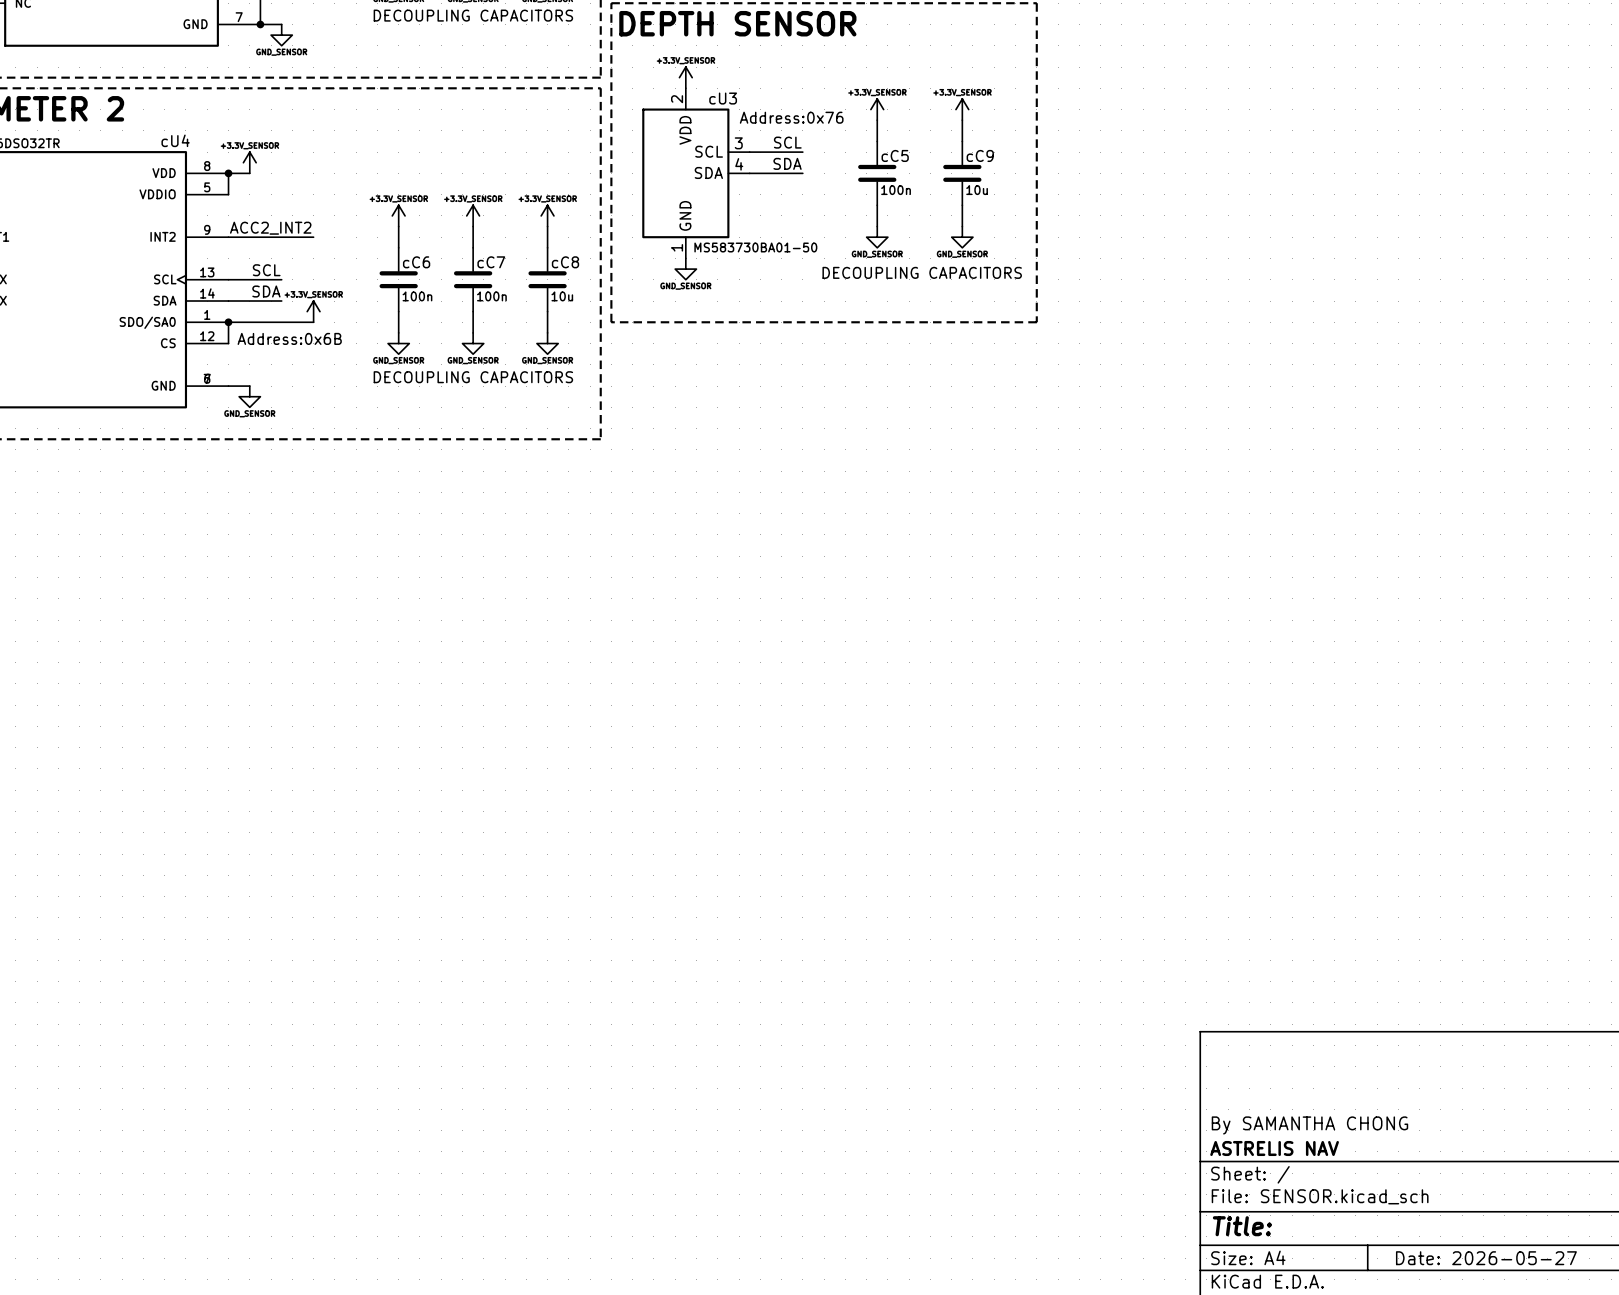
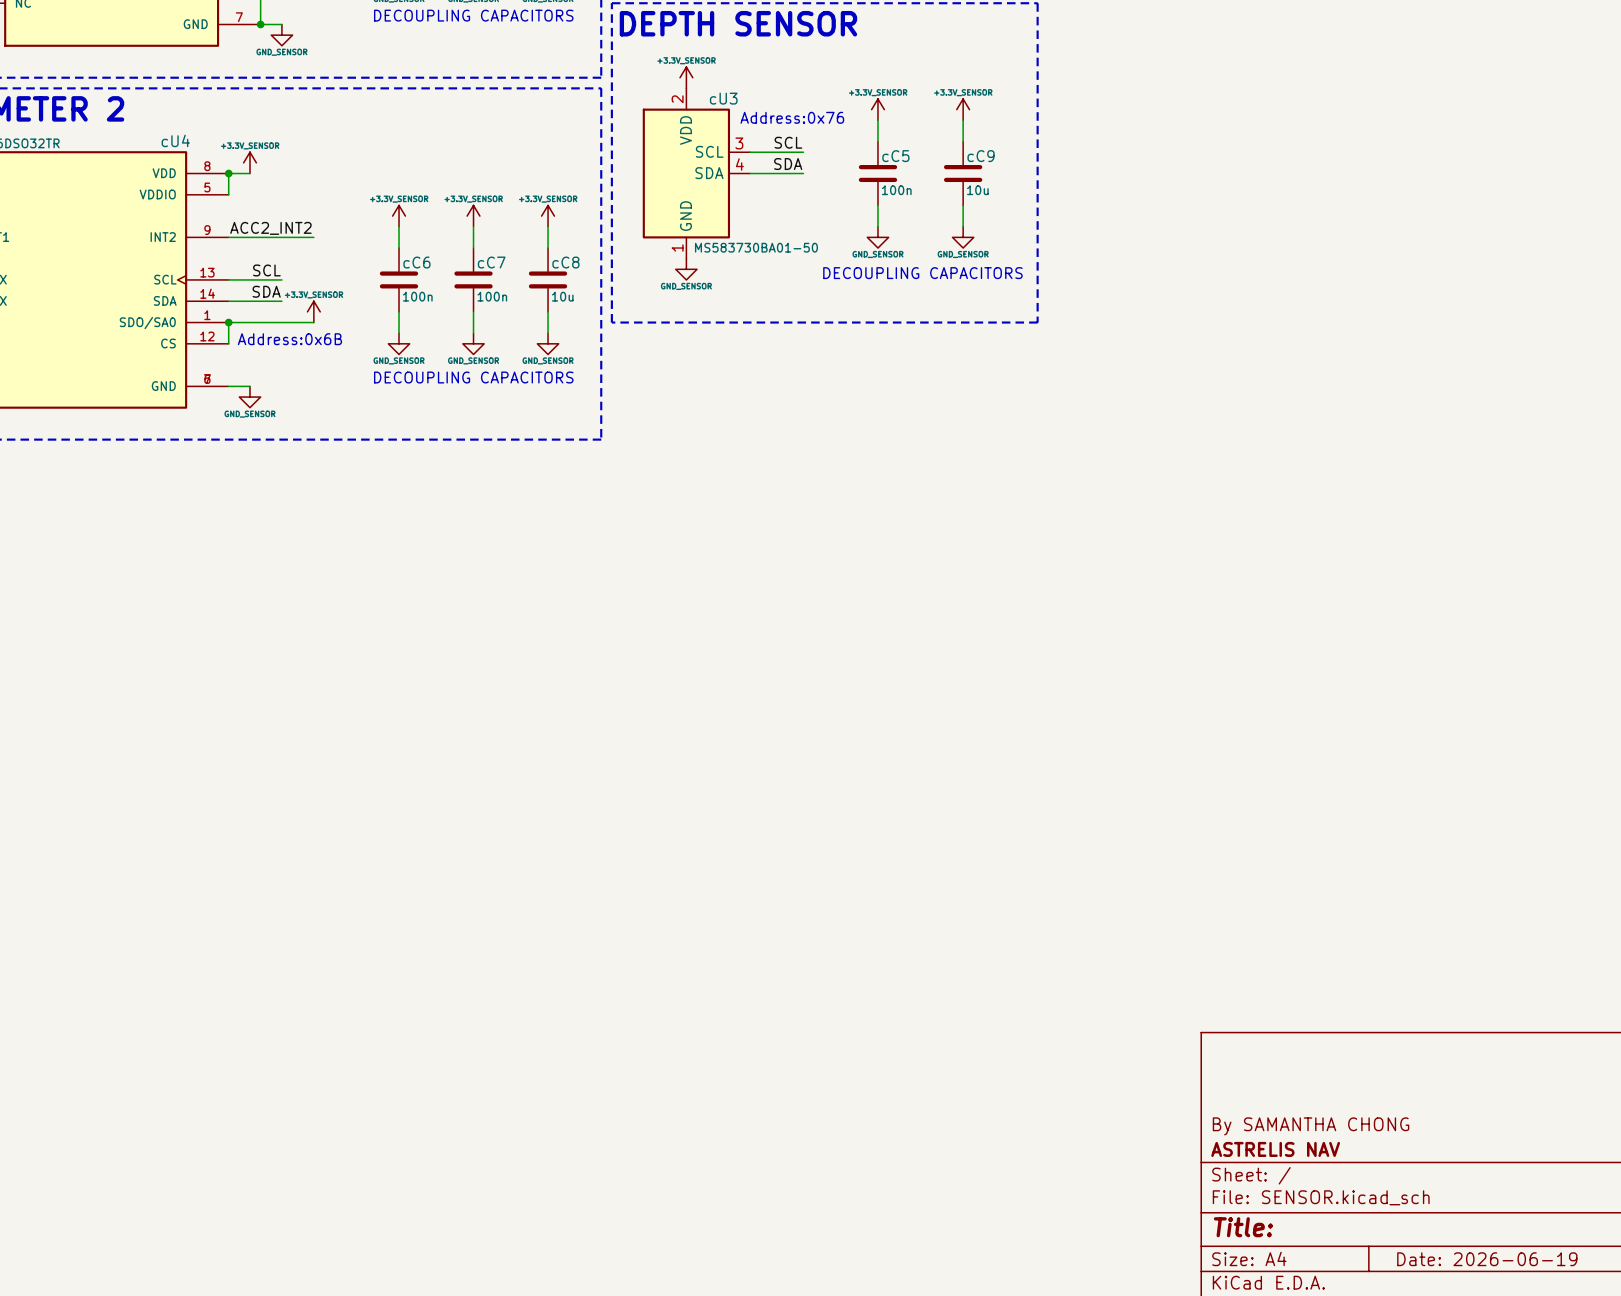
title block: Date: 2026-05-27 (1486, 1258) -> Date: 2026-06-19 (1487, 1259)

